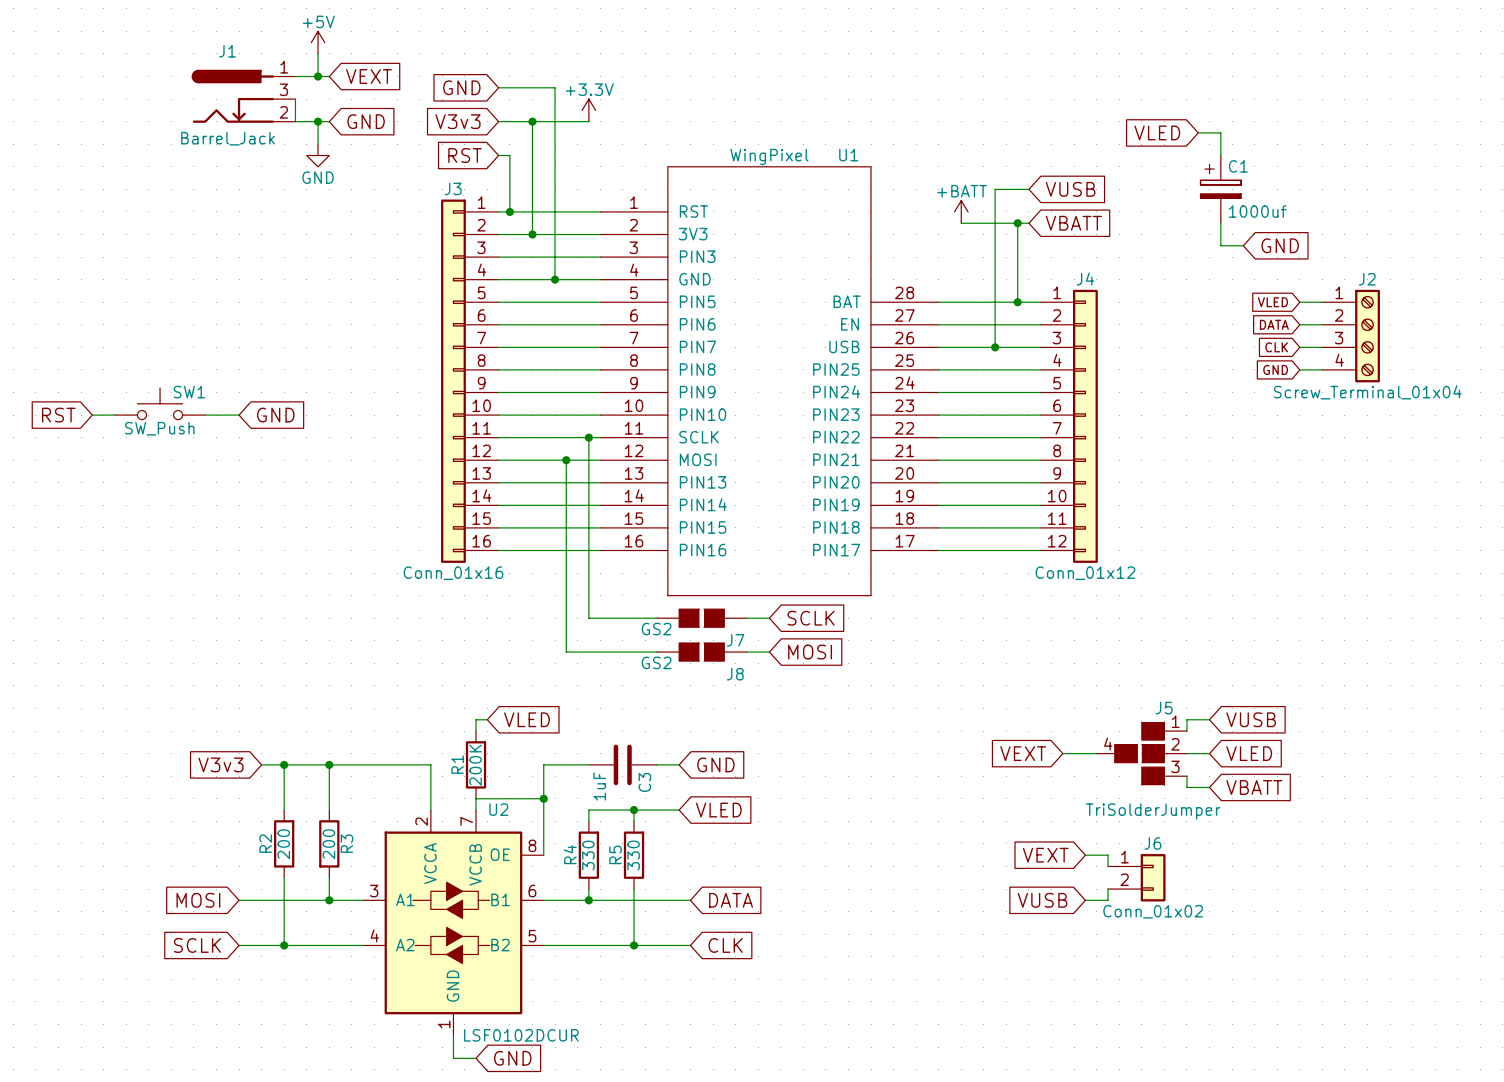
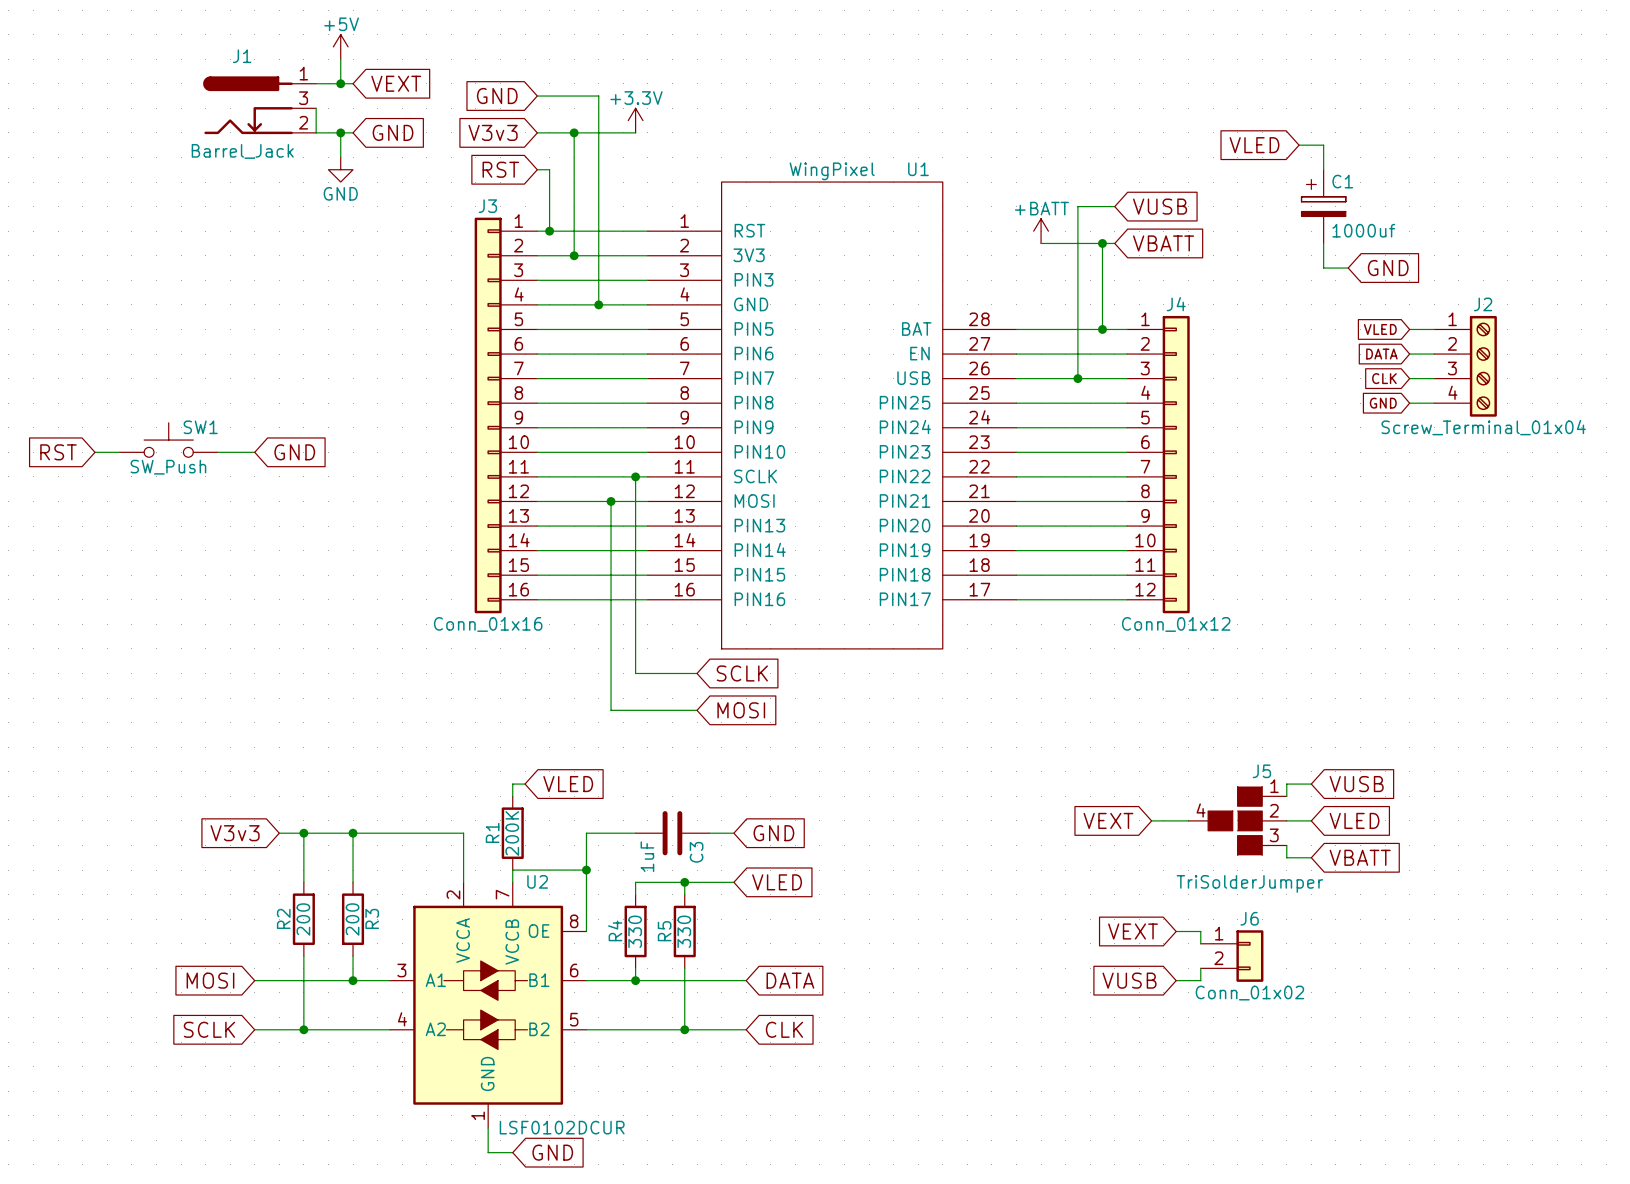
wire: (645, 618) (656, 618) -> none
J7: GS2 (701, 618) -> none
wire: (746, 618) (769, 618) -> none
global label position: SCLK (811, 618) -> SCLK (742, 673)
wire: (645, 652) (656, 652) -> none
J8: GS2 (701, 652) -> none
wire: (746, 652) (769, 652) -> none
global label position: MOSI (810, 652) -> MOSI (741, 710)

